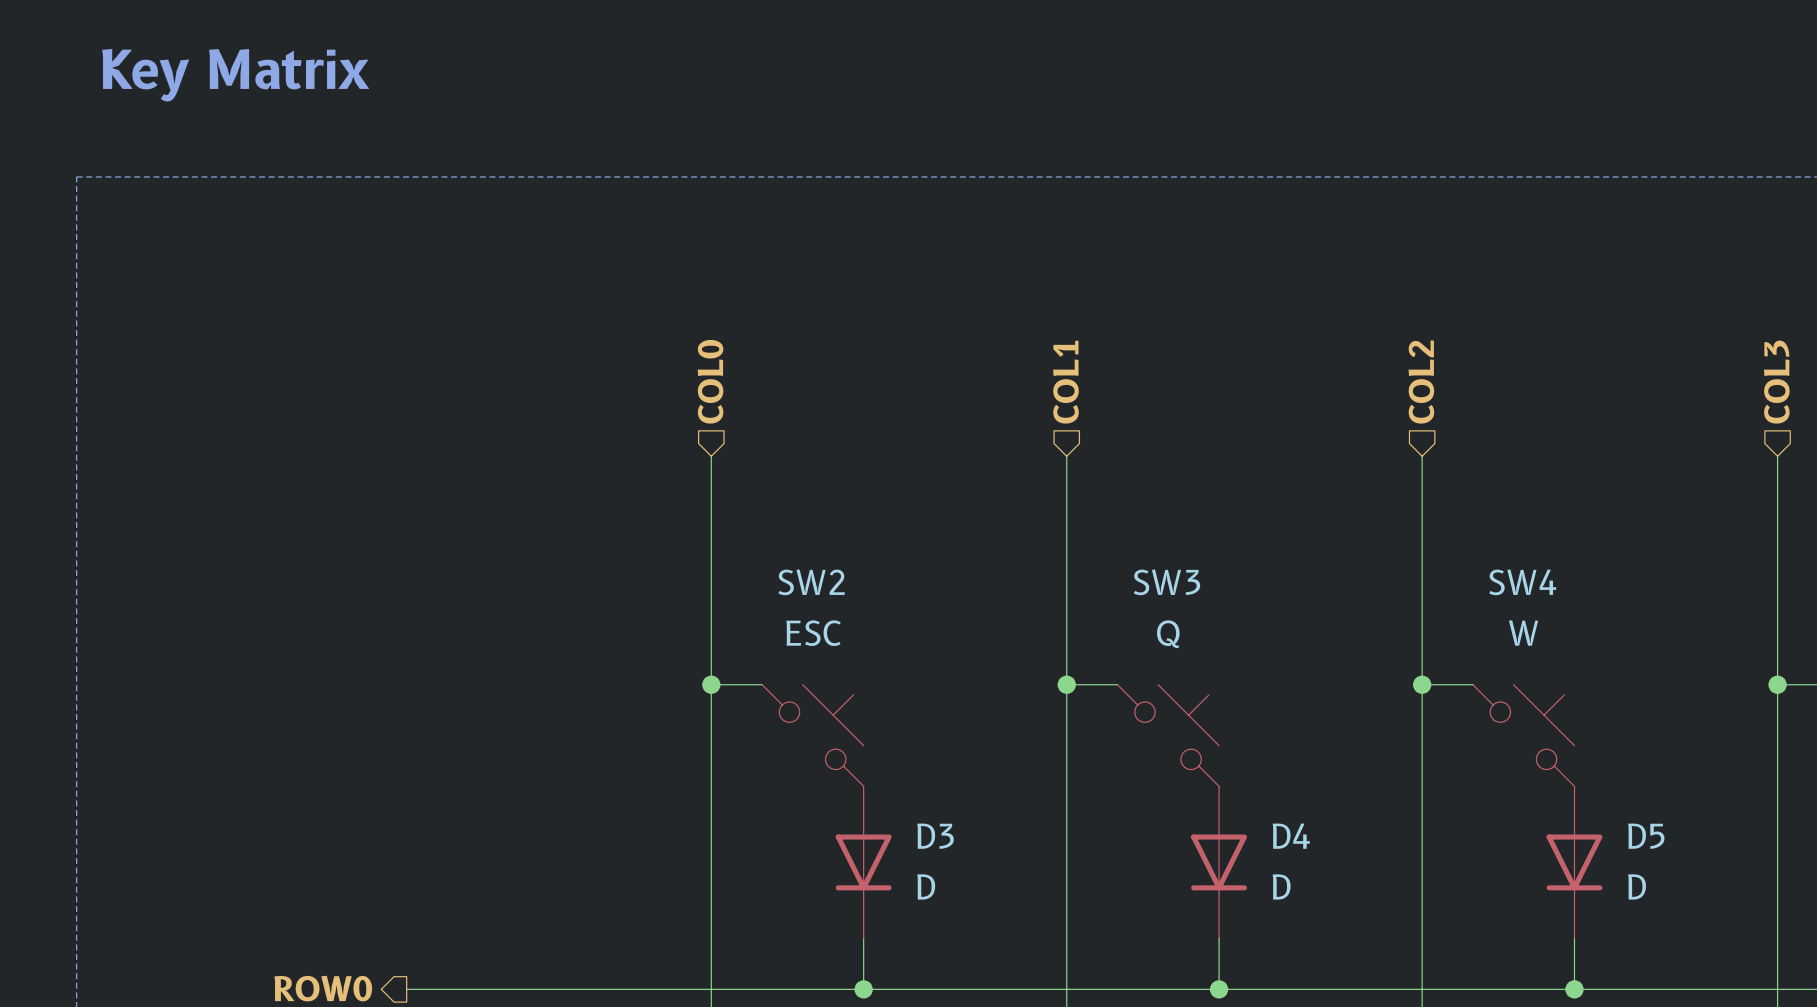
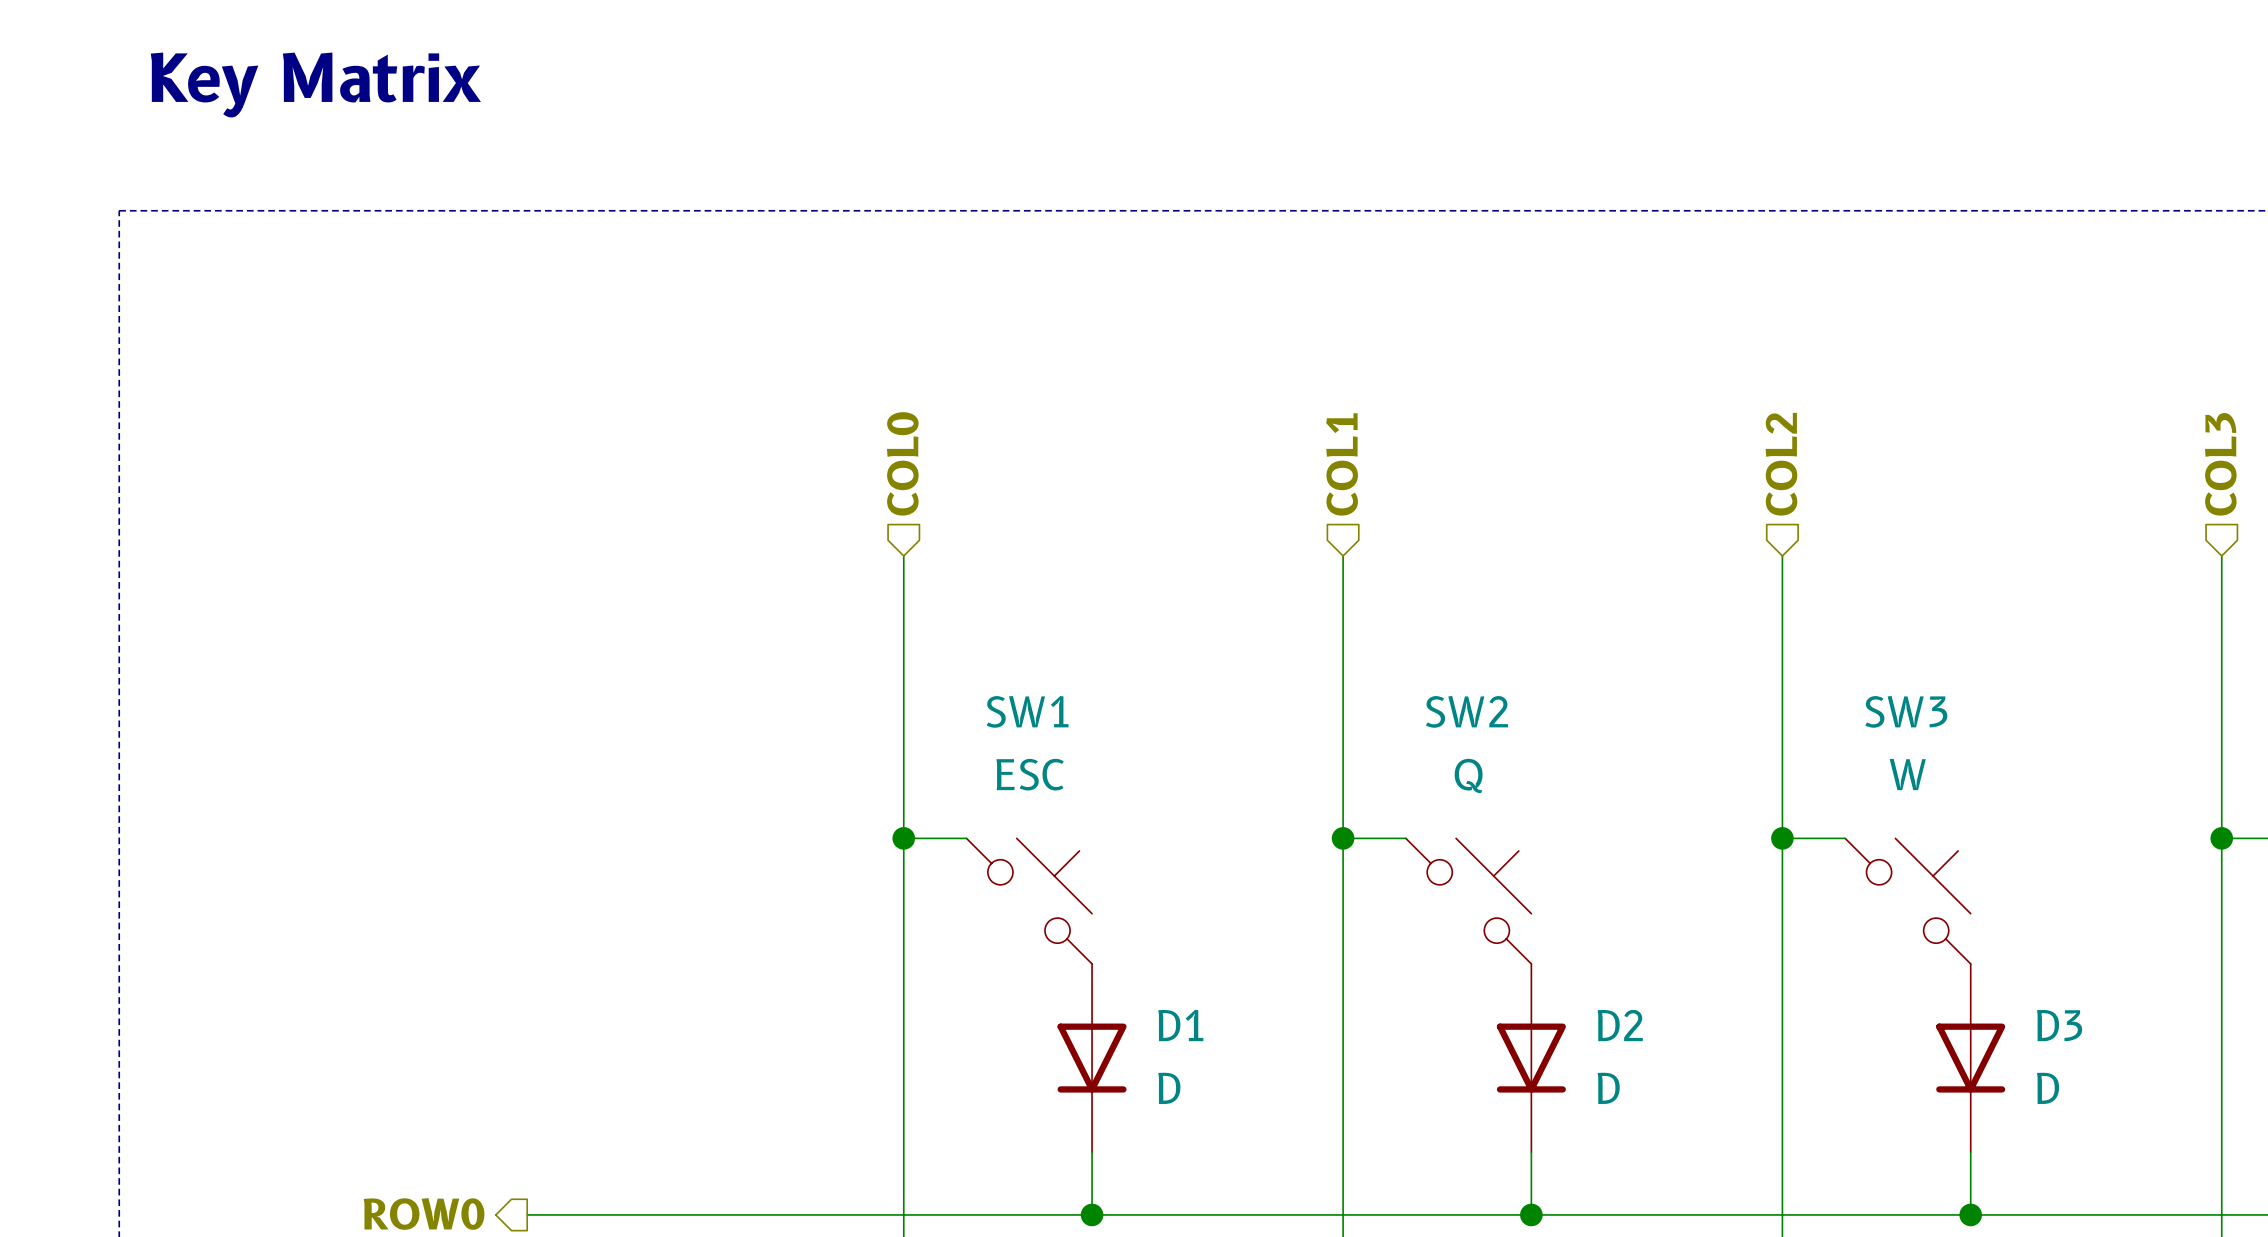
SW2 name: SW2 (811, 582) -> SW1 (1027, 711)
SW3 name: SW3 (1166, 582) -> SW2 (1466, 711)
SW4 name: SW4 (1522, 582) -> SW3 (1906, 711)
D3 name: D3 (935, 836) -> D1 (1180, 1025)
D4 name: D4 (1291, 836) -> D2 (1620, 1025)
D5 name: D5 (1646, 836) -> D3 (2059, 1025)

